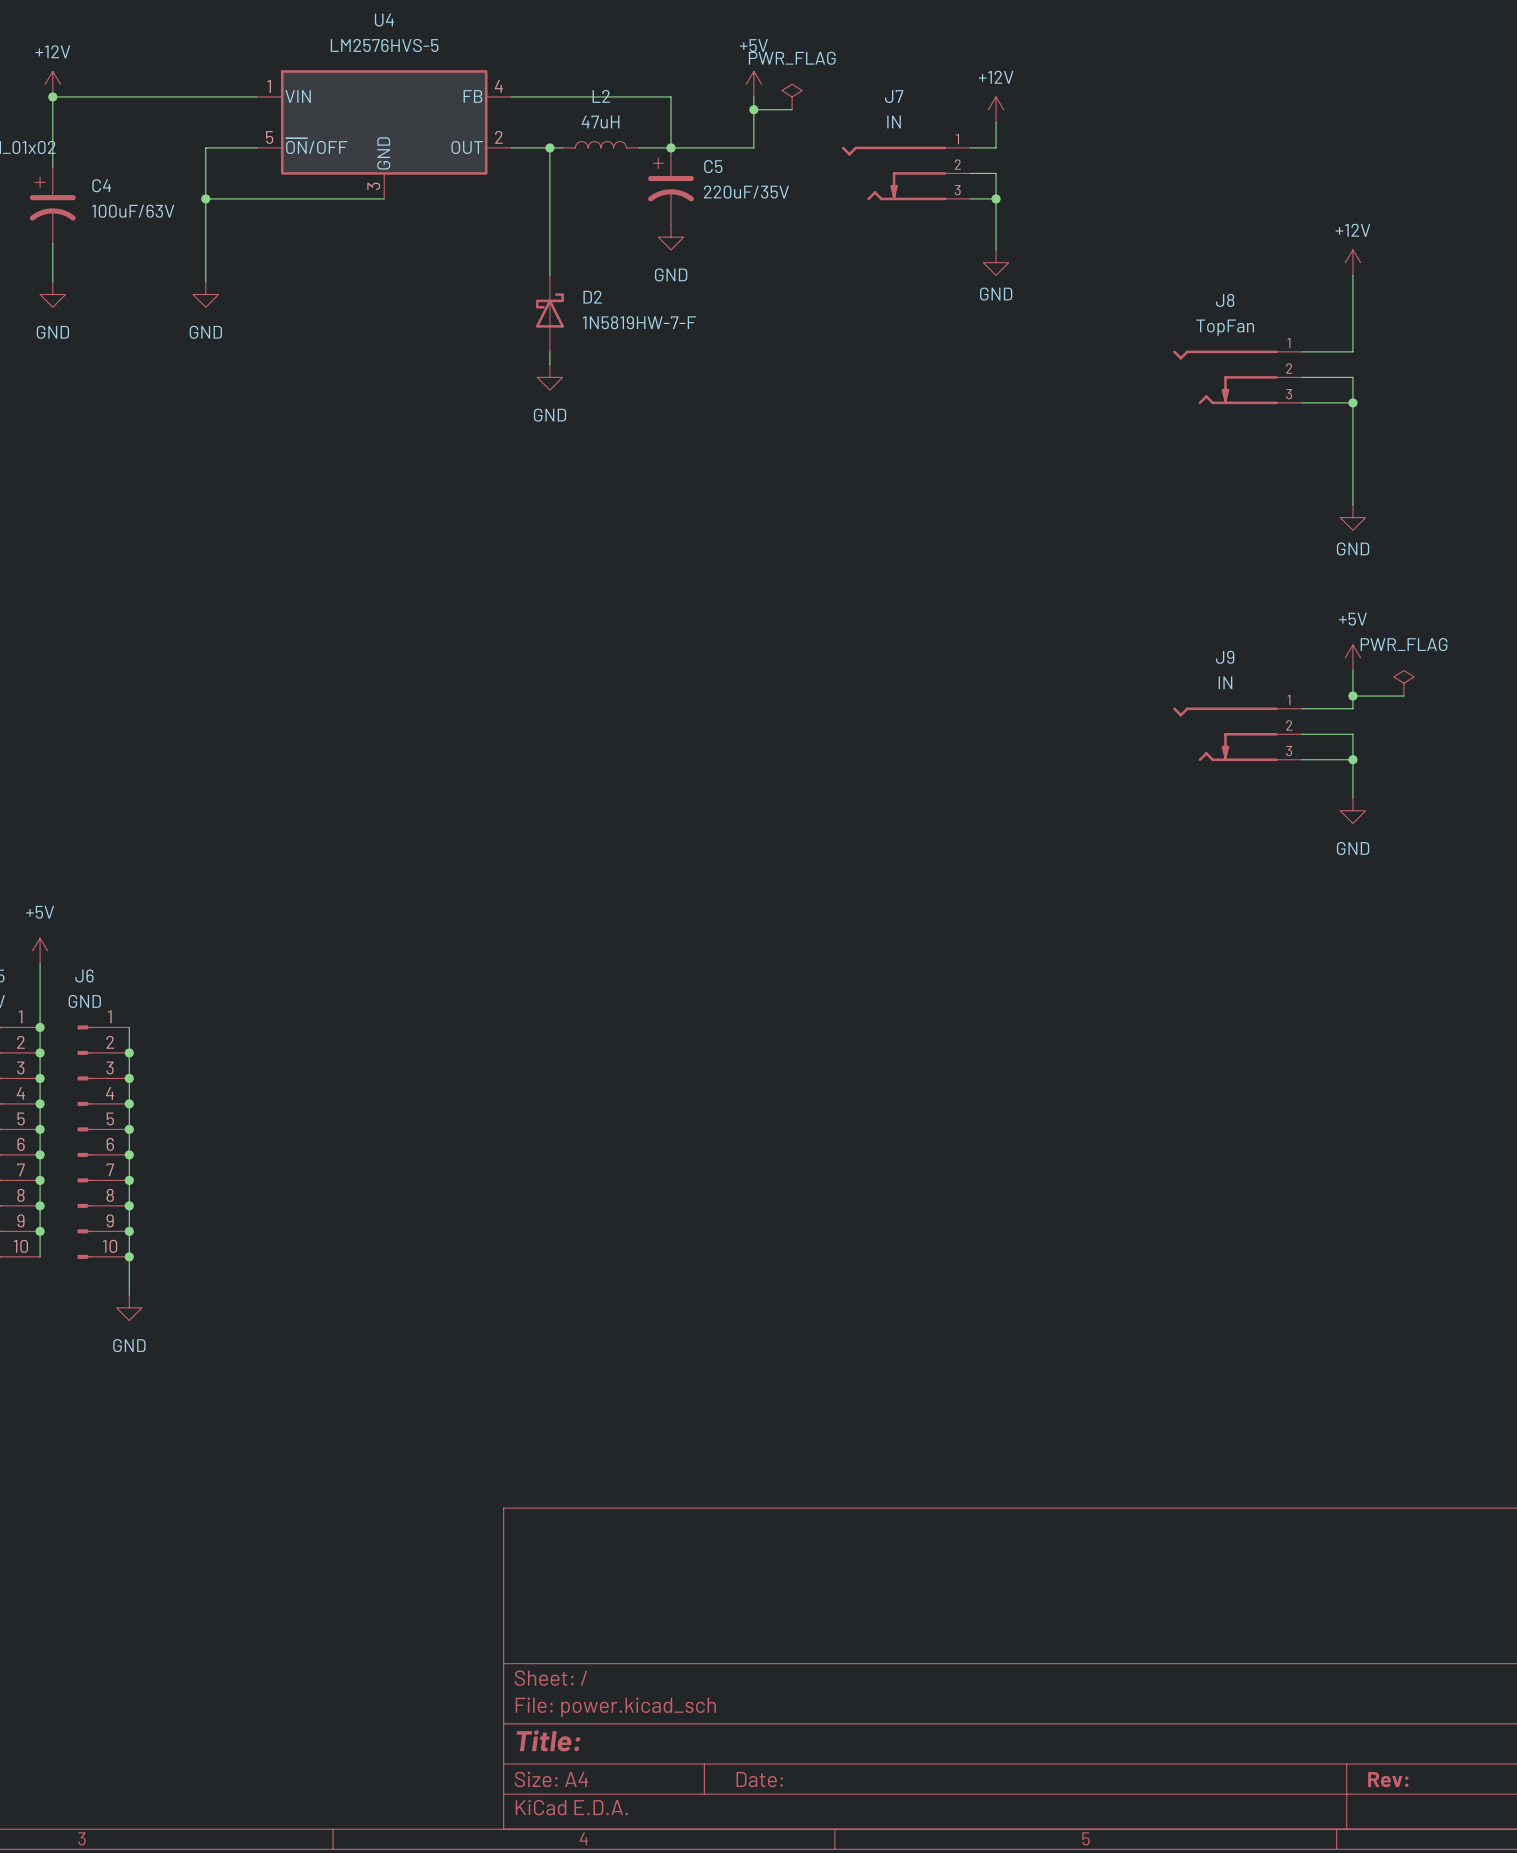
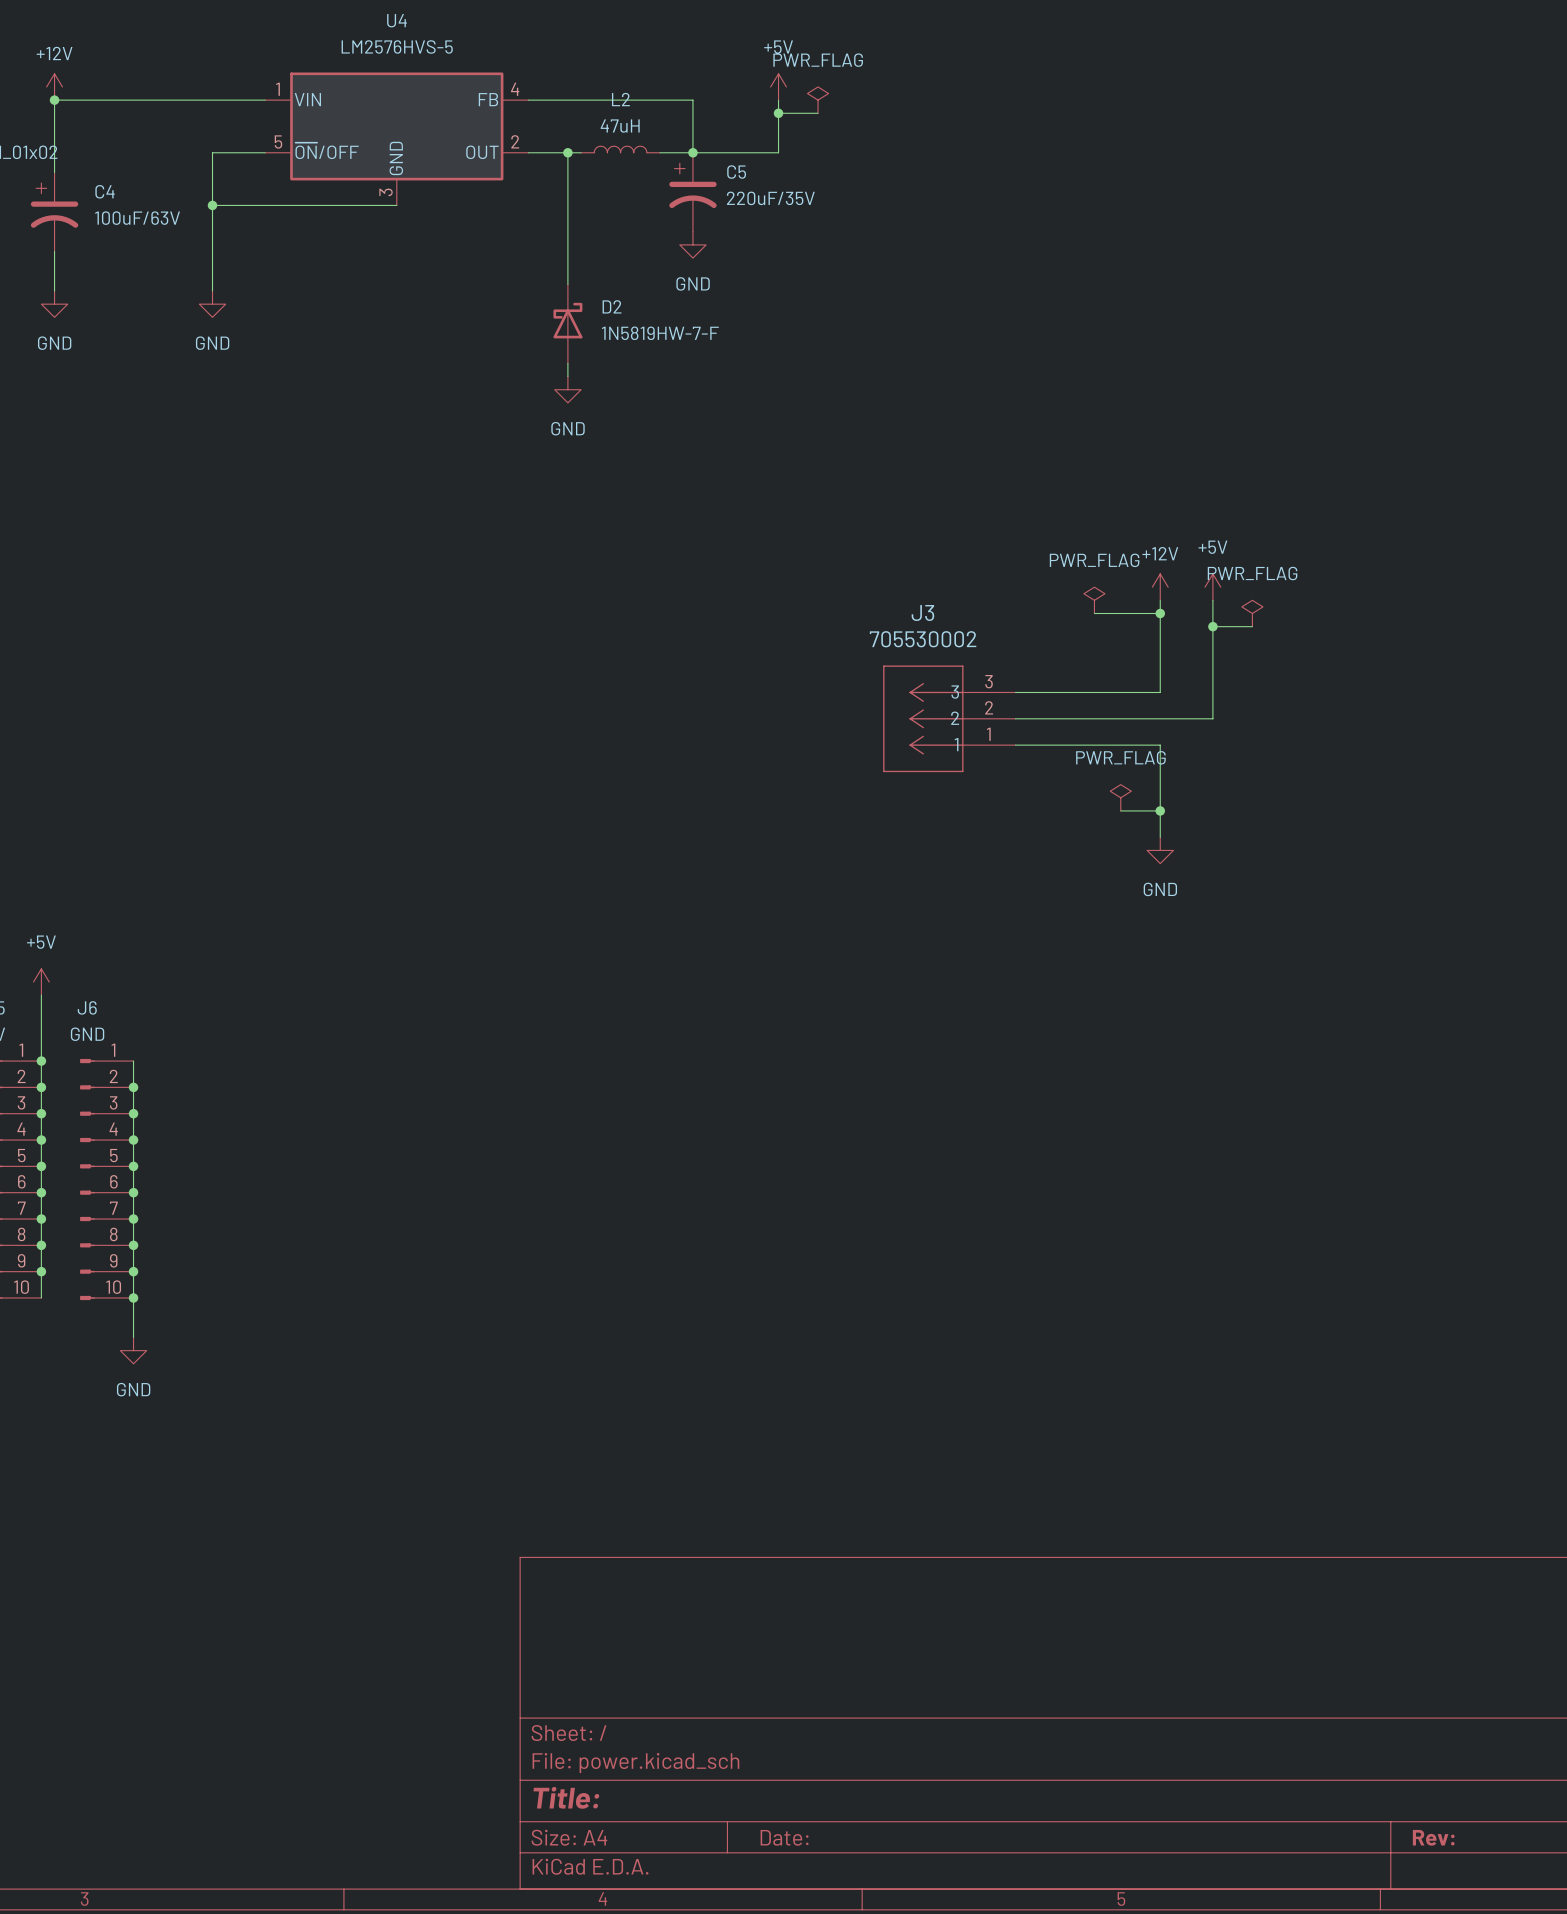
power symbol: +12V (996, 109) -> none
wire: (996, 122) (996, 147) (970, 147) -> none
J7: IN (906, 173) -> none
wire: (970, 173) (996, 173) (996, 249) -> none
wire: (970, 198) (996, 198) -> none
junction: (996, 198) -> none
power symbol: GND (996, 262) -> none
power symbol: +12V (1352, 262) -> none
wire: (1352, 275) (1352, 351) (1301, 351) -> none
J8: TopFan (1237, 377) -> none
wire: (1301, 377) (1352, 377) (1352, 504) -> none
wire: (1301, 402) (1352, 402) -> none
junction: (1352, 402) -> none
power symbol: GND (1352, 517) -> none
power symbol: none -> +12V (1160, 587)
power symbol: none -> PWR_FLAG (1094, 600)
wire: none -> (1160, 600) (1160, 692) (1015, 692)
wire: none -> (1212, 600) (1212, 718) (1015, 718)
wire: none -> (1094, 613) (1160, 613)
junction: none -> (1160, 613)
power symbol: none -> PWR_FLAG (1252, 613)
wire: none -> (1212, 626) (1252, 626)
junction: none -> (1212, 626)
power symbol position: +5V (1352, 657) -> +5V (1212, 587)
wire: (1352, 670) (1352, 708) (1301, 708) -> none
power symbol: PWR_FLAG (1403, 683) -> none
J3: none -> 705530002 (949, 718)
wire: (1352, 696) (1403, 696) -> none
junction: (1352, 696) -> none
wire: none -> (1015, 745) (1160, 745) (1160, 837)
J9: IN (1237, 734) -> none
wire: (1301, 734) (1352, 734) (1352, 798) -> none
wire: (1301, 759) (1352, 759) -> none
junction: (1352, 759) -> none
power symbol: none -> PWR_FLAG (1120, 797)
wire: none -> (1120, 810) (1160, 810)
junction: none -> (1160, 810)
power symbol: GND (1352, 810) -> none
power symbol: none -> GND (1160, 850)

